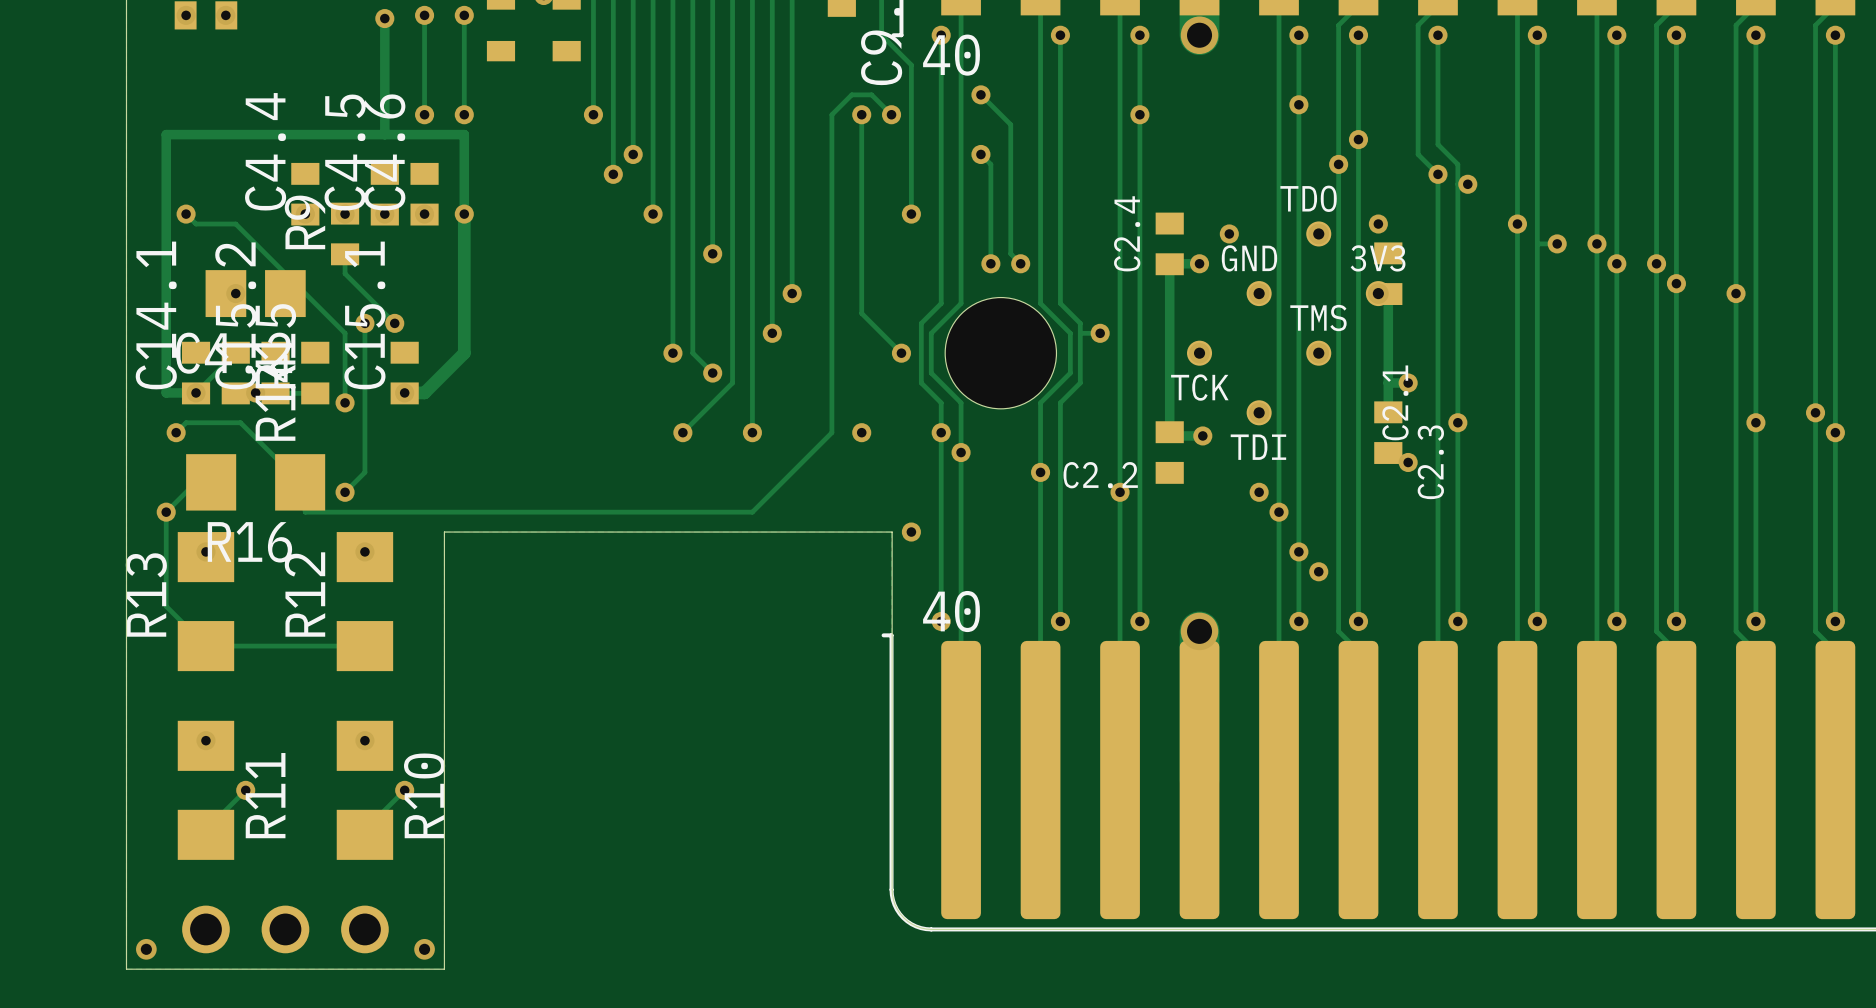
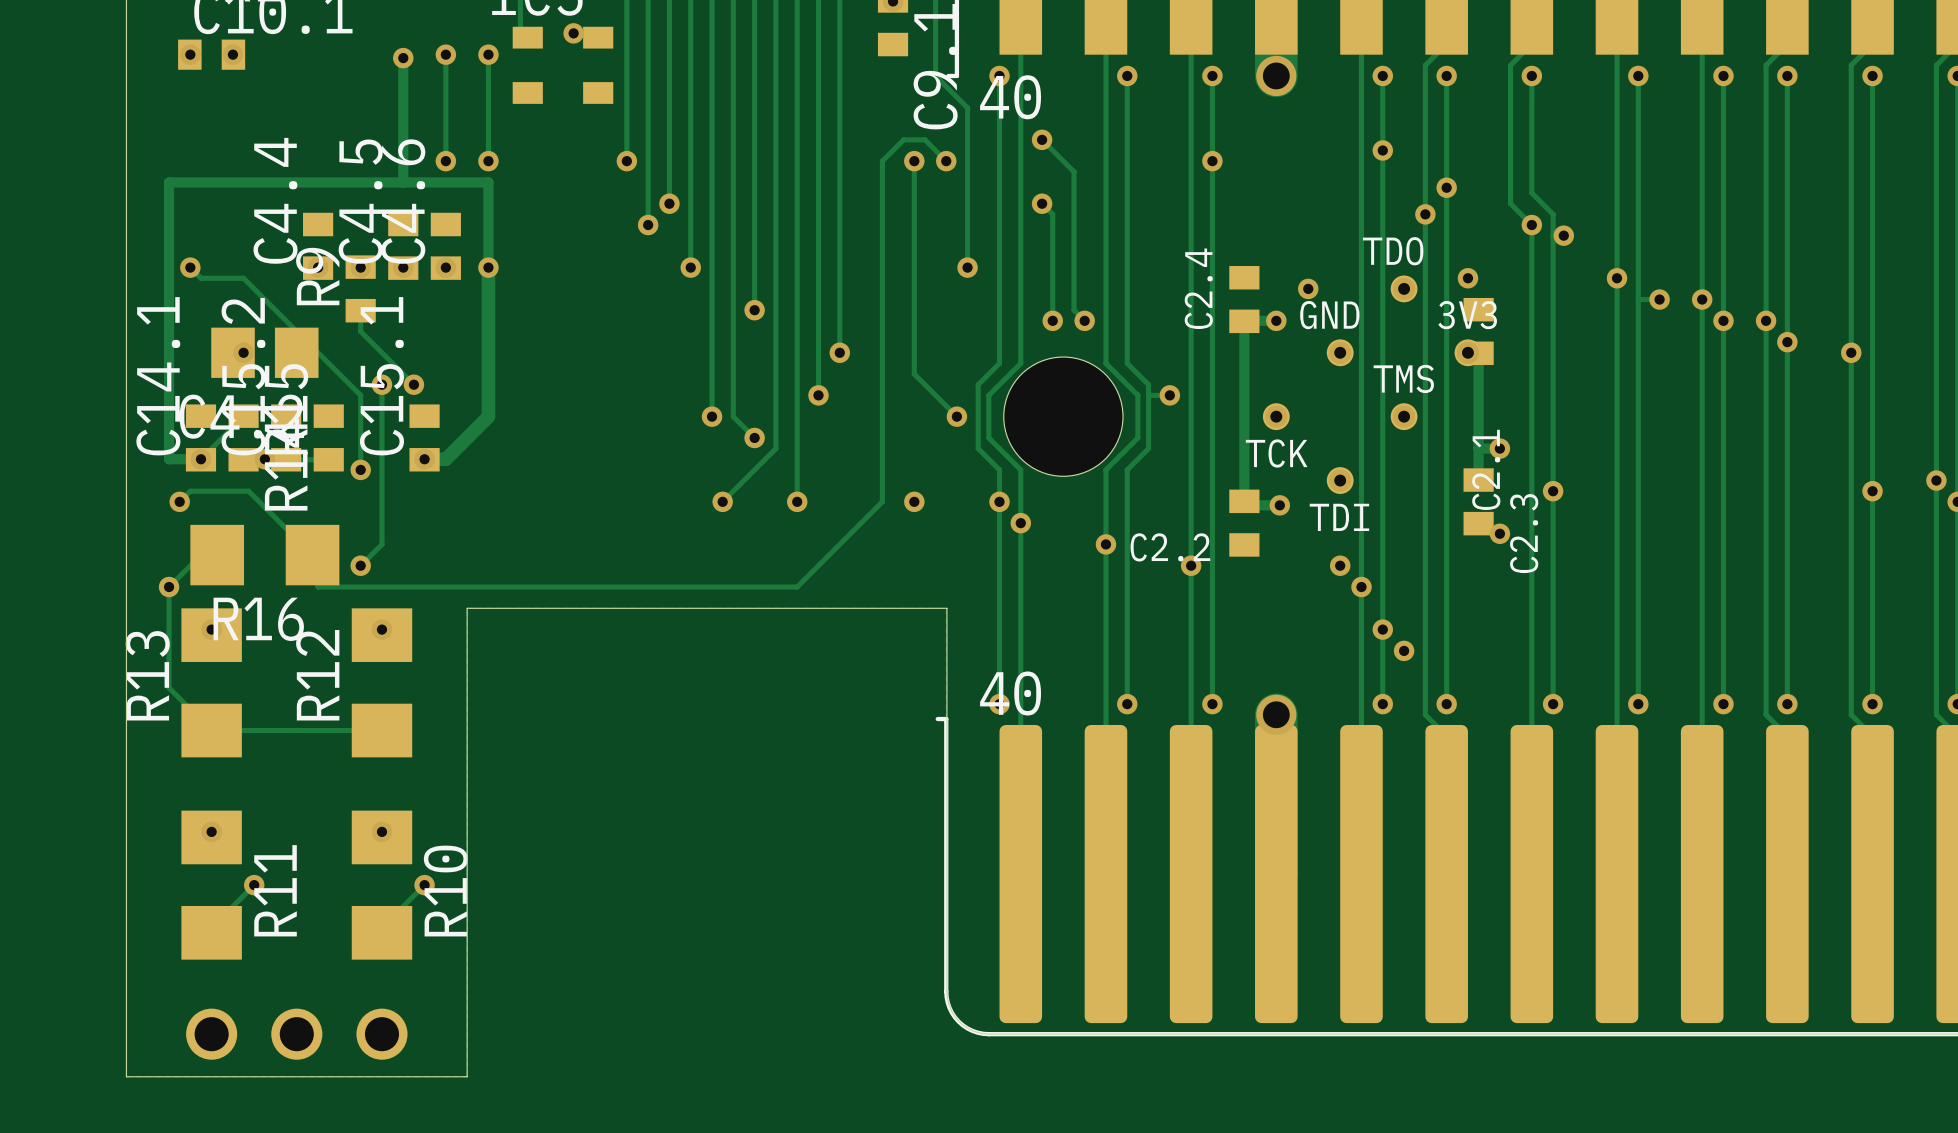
via: (911, 532) -> none
via: (146, 949) -> none
via: (424, 949) -> none

